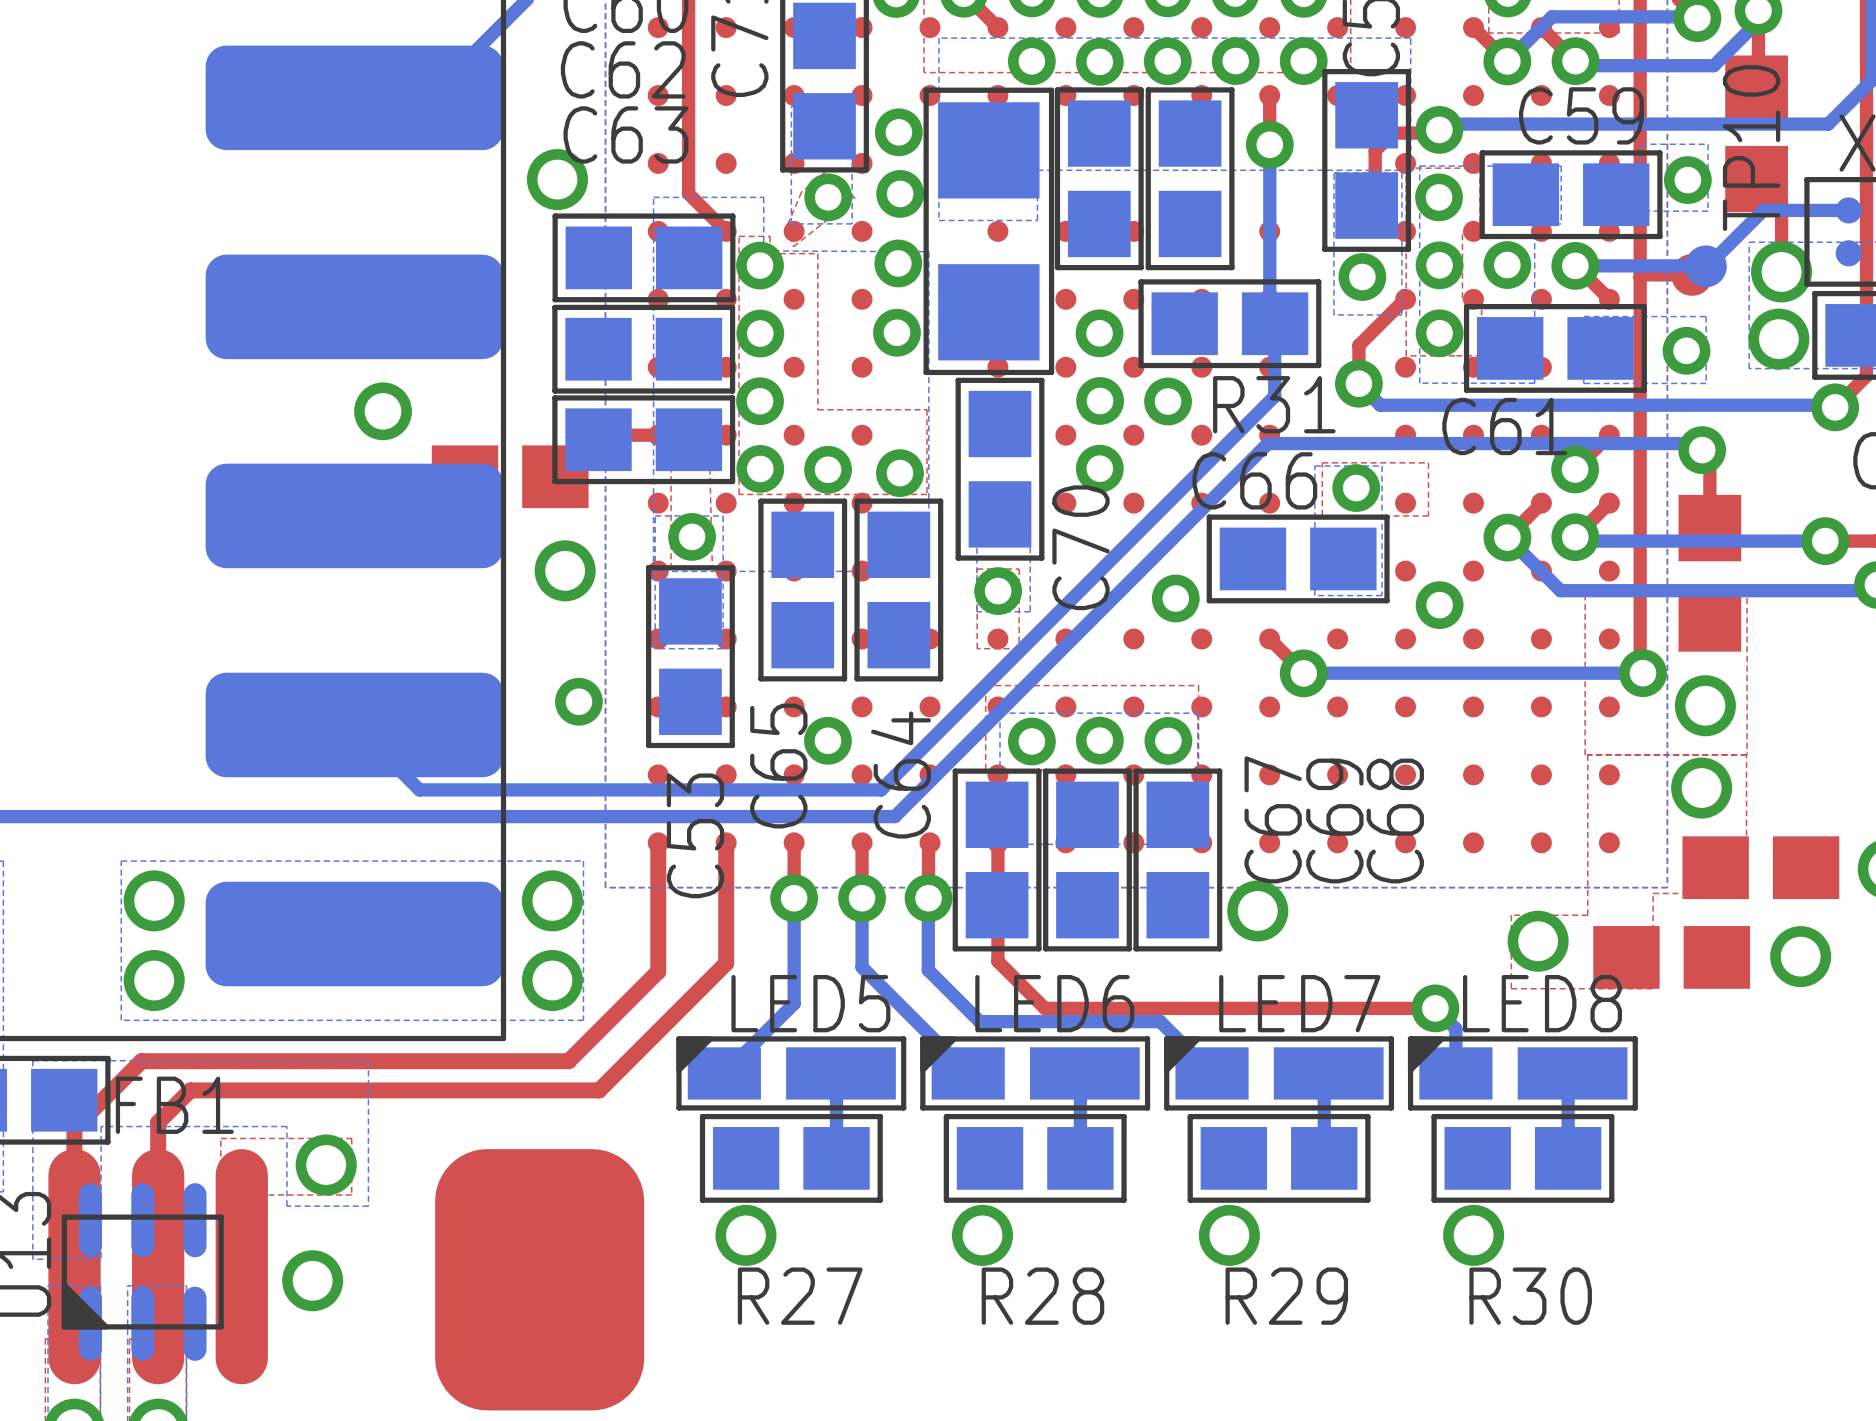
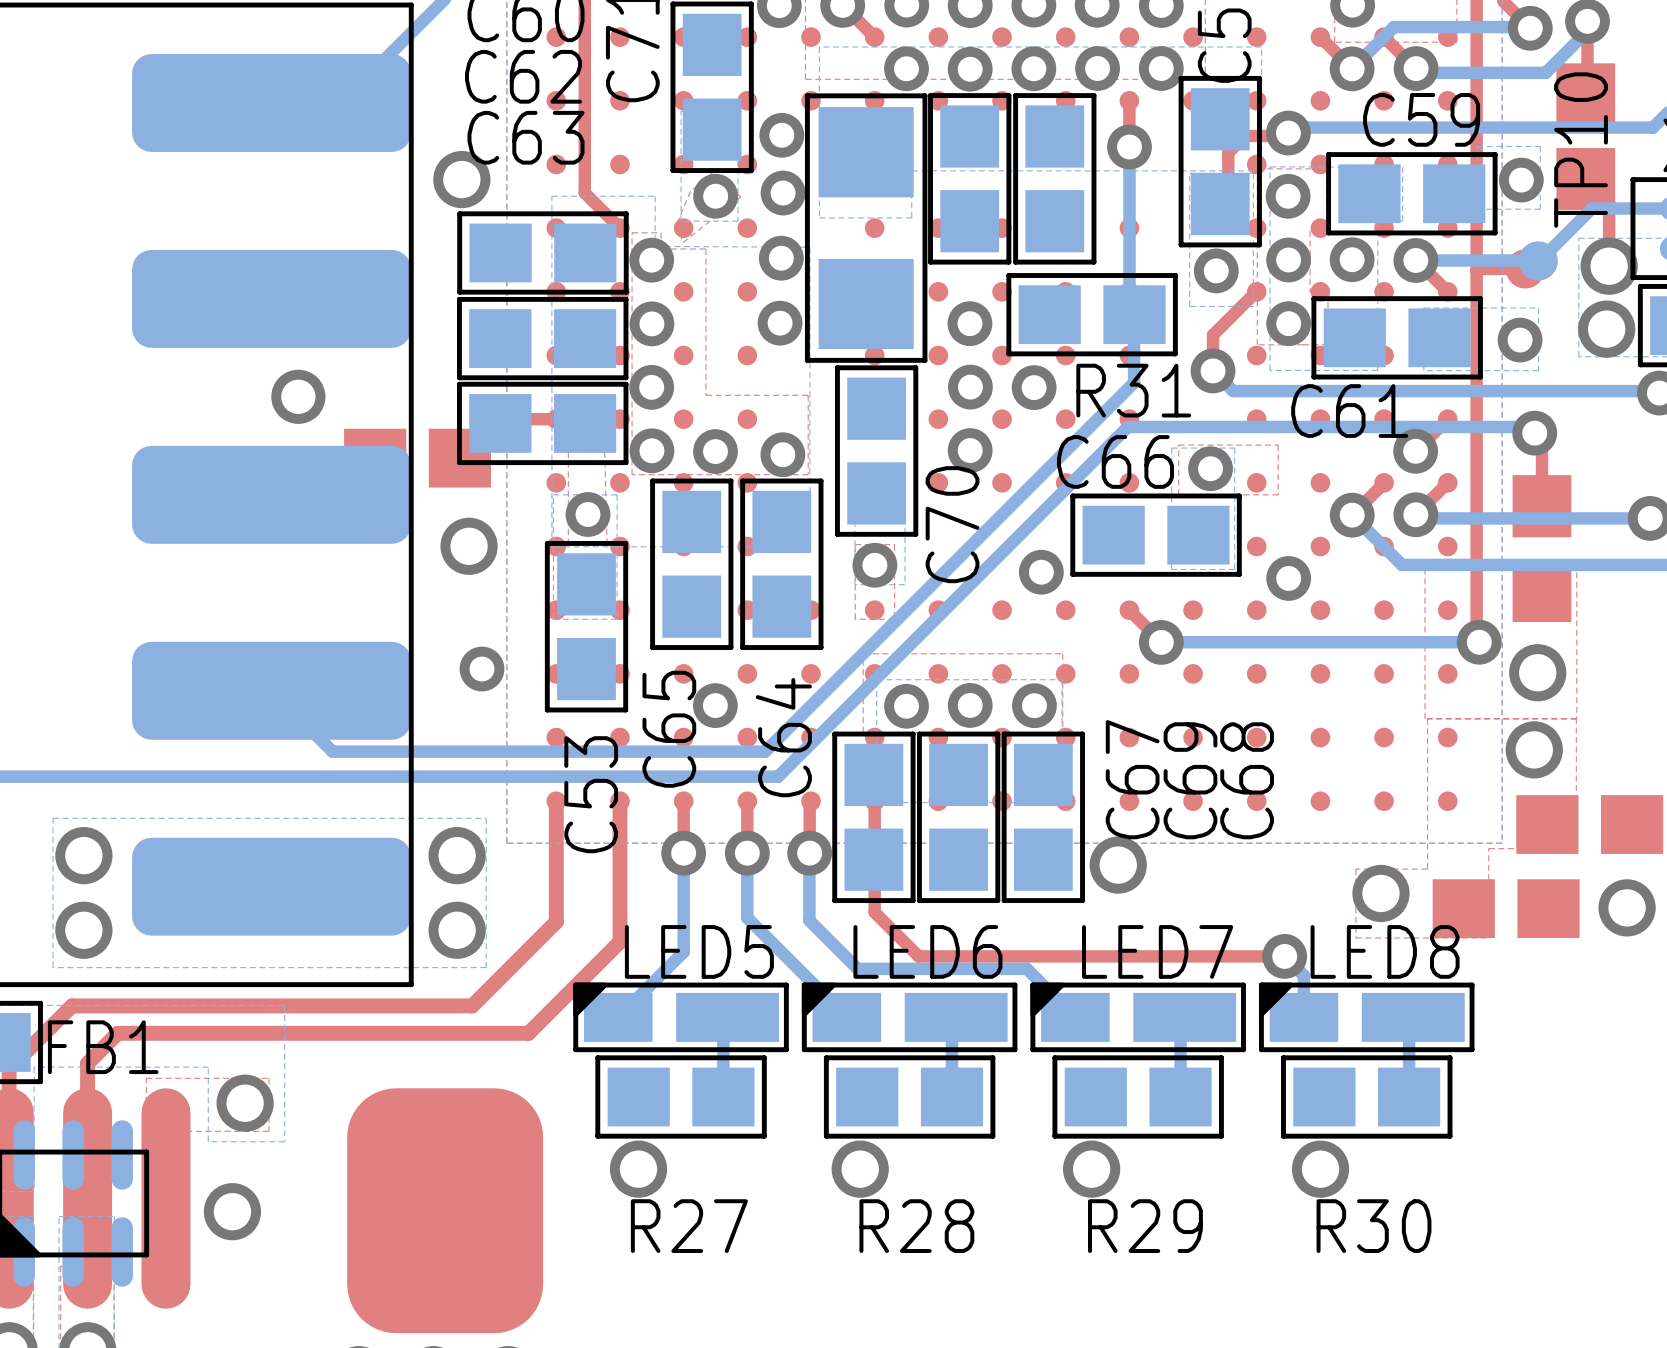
top track: (726, 963) (599, 1090) -> (619, 914) (619, 941) (528, 1033) (500, 1033)

